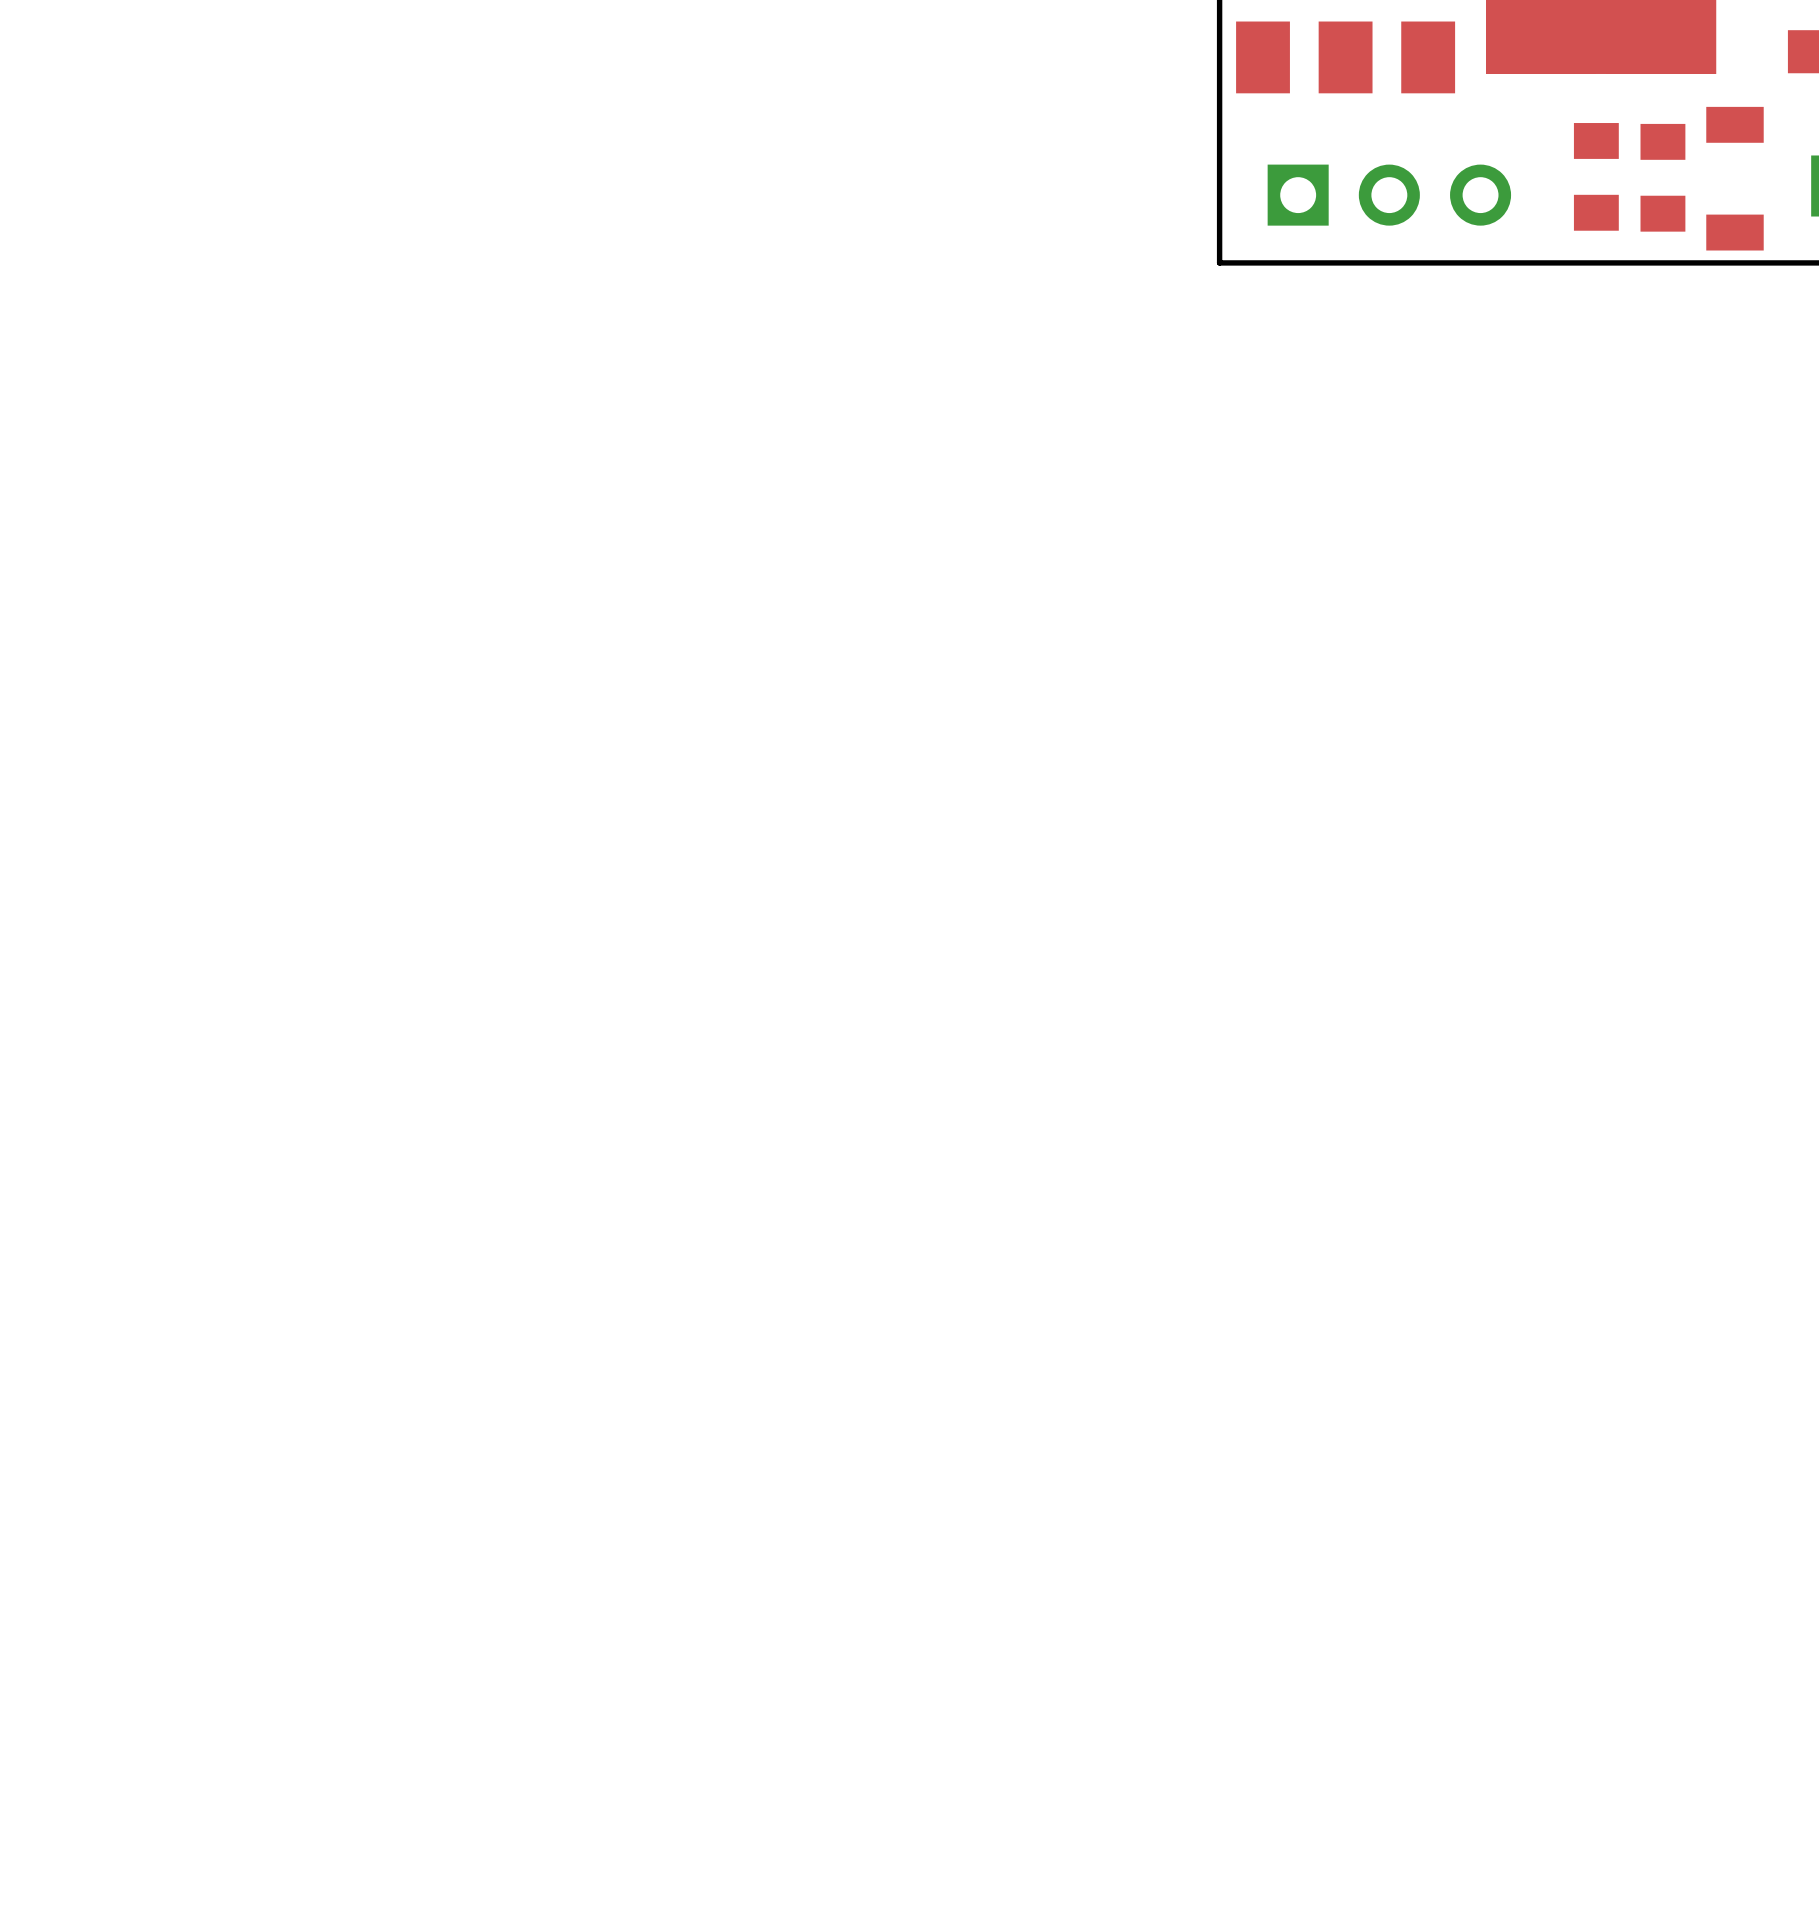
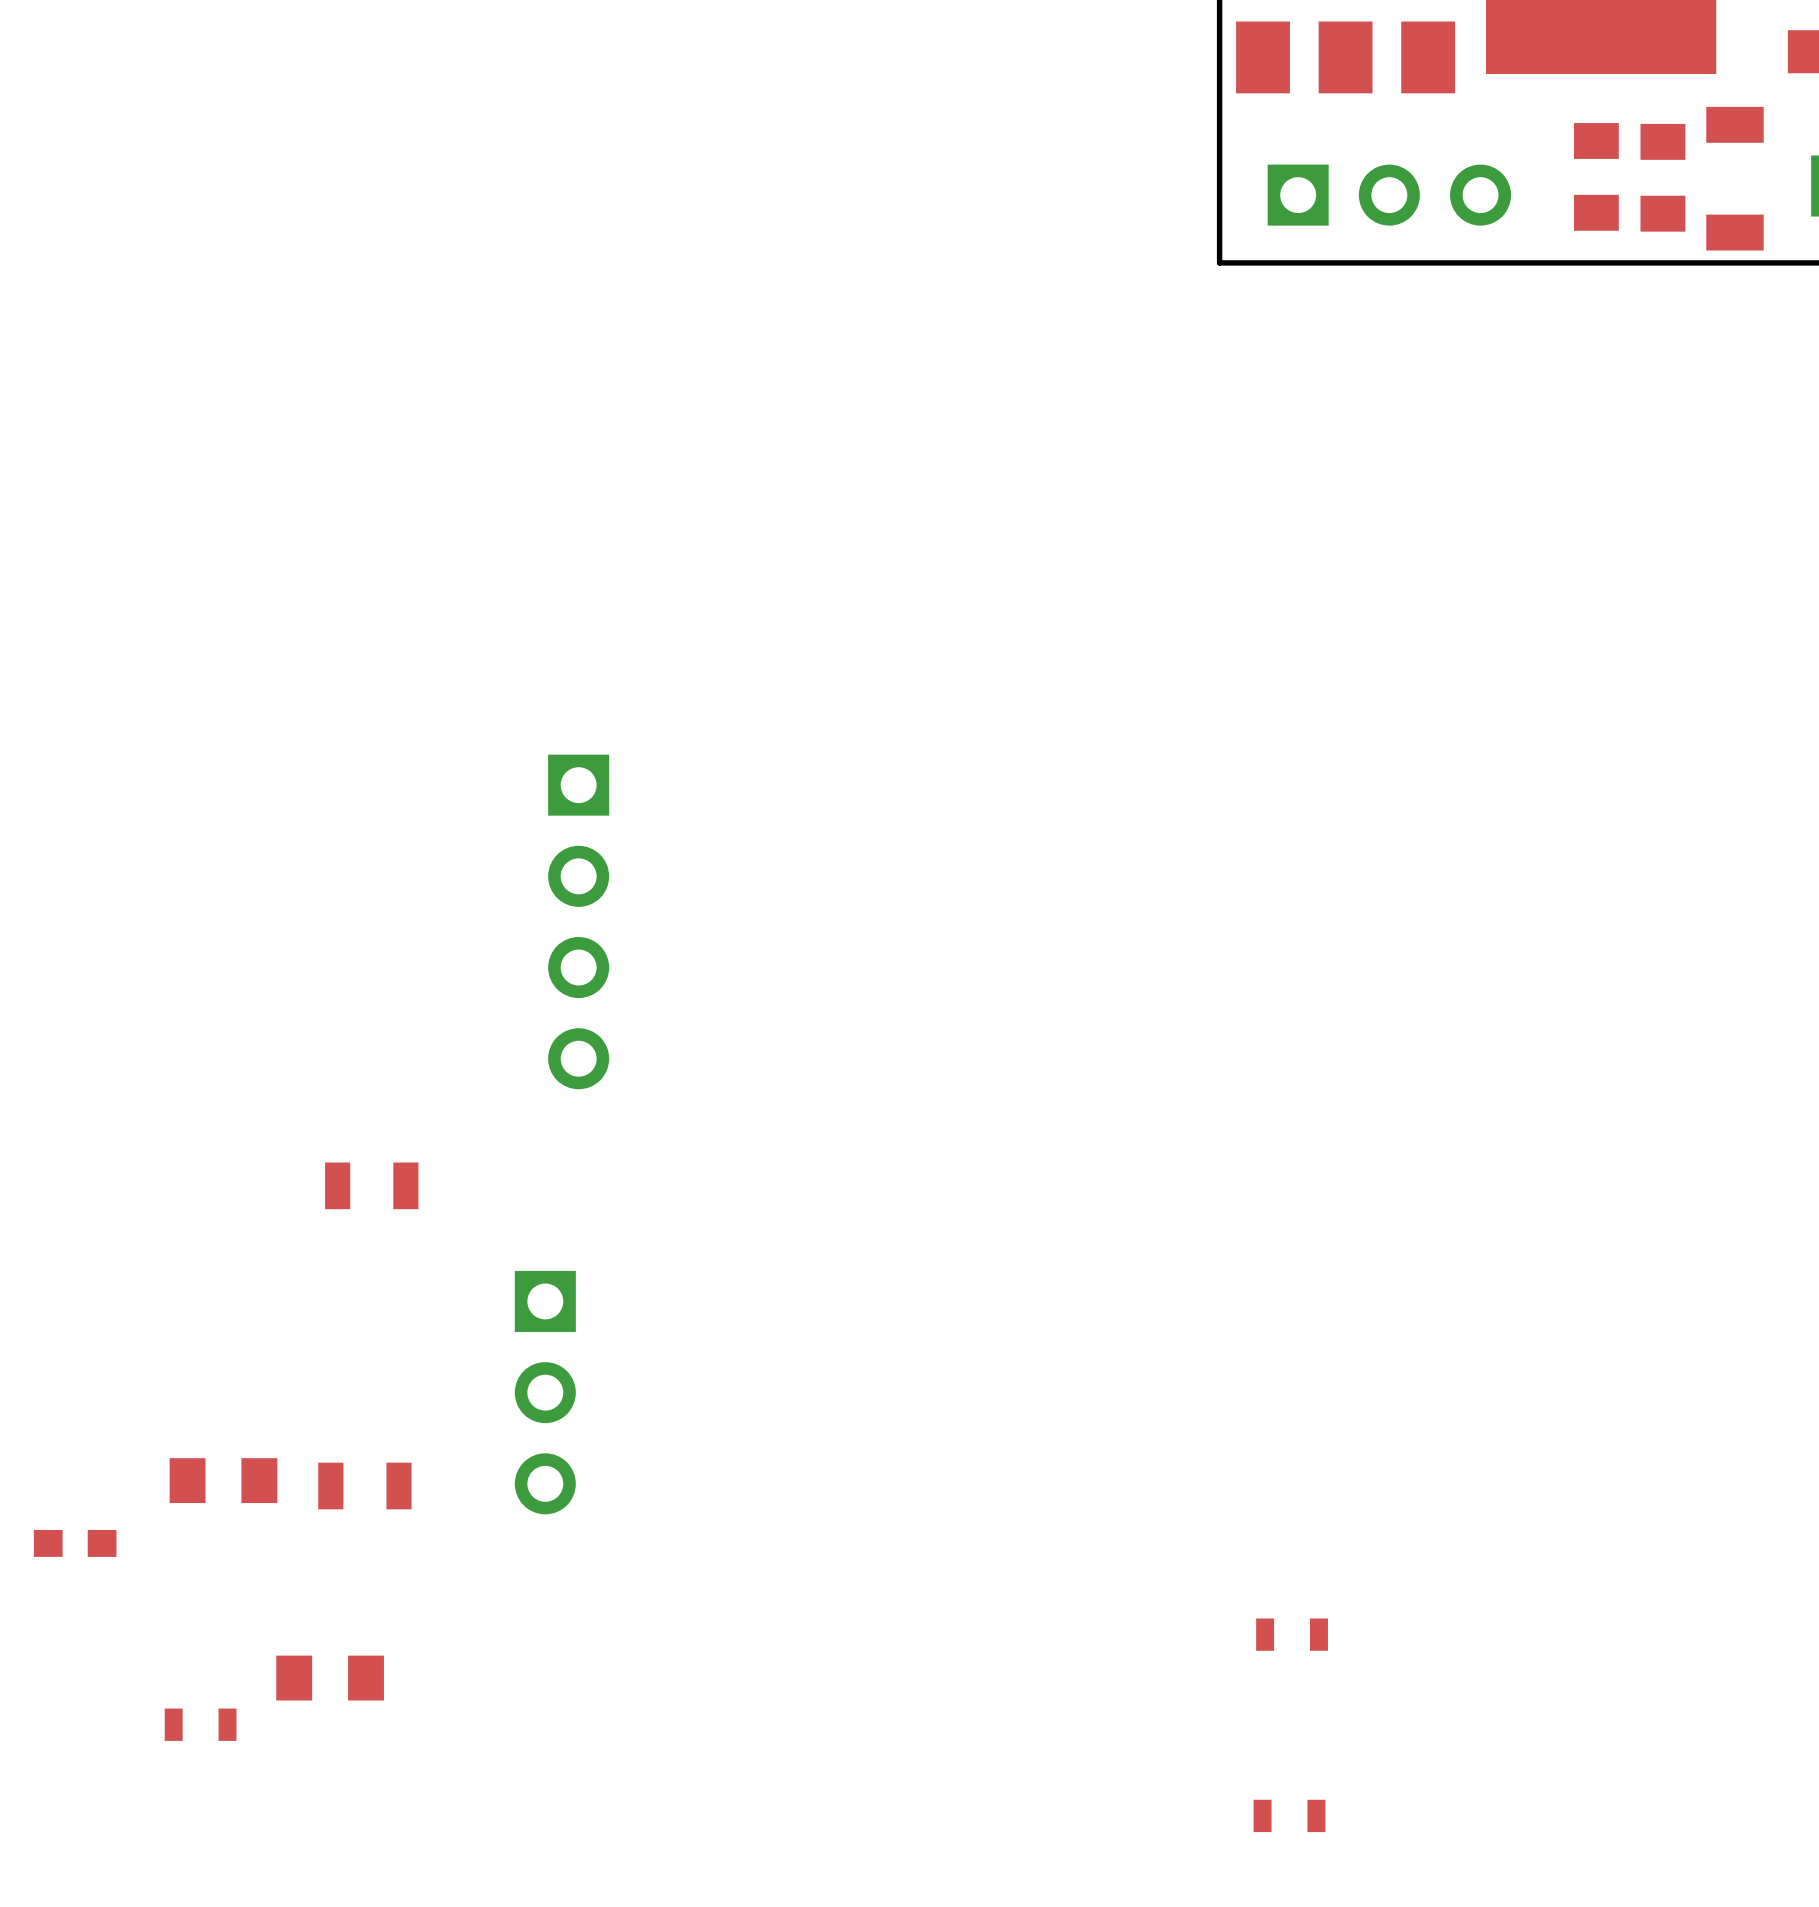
part: none -> (578, 921)
part: none -> (371, 1185)
part: none -> (545, 1392)
part: none -> (223, 1480)
part: none -> (364, 1485)
part: none -> (75, 1543)
part: none -> (1292, 1634)
part: none -> (330, 1678)
part: none -> (200, 1724)
part: none -> (1289, 1815)

